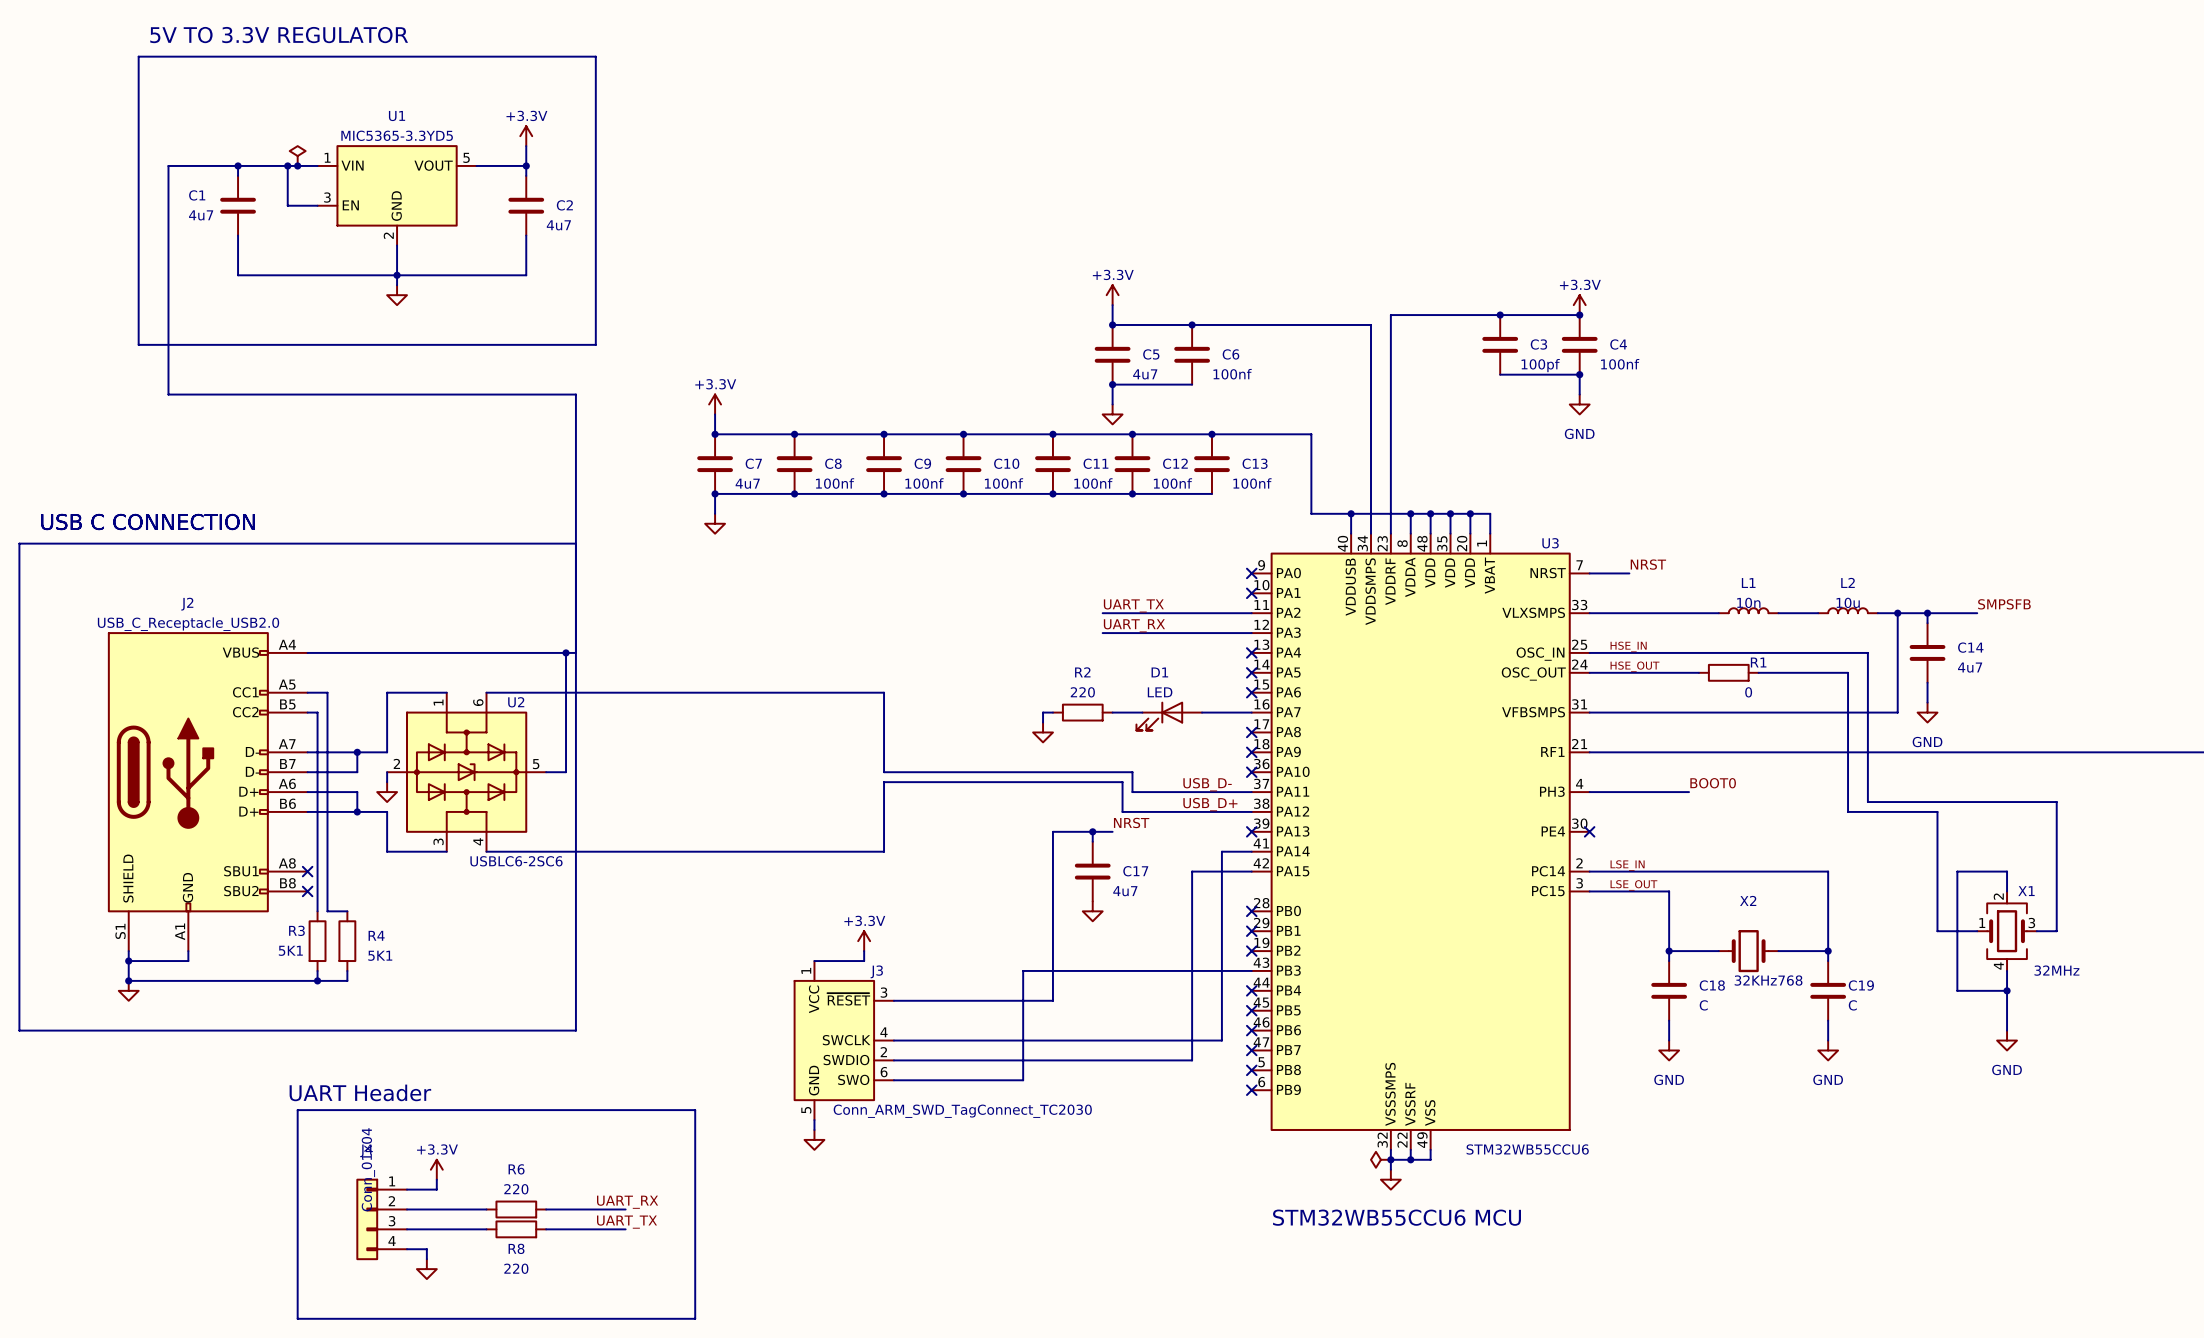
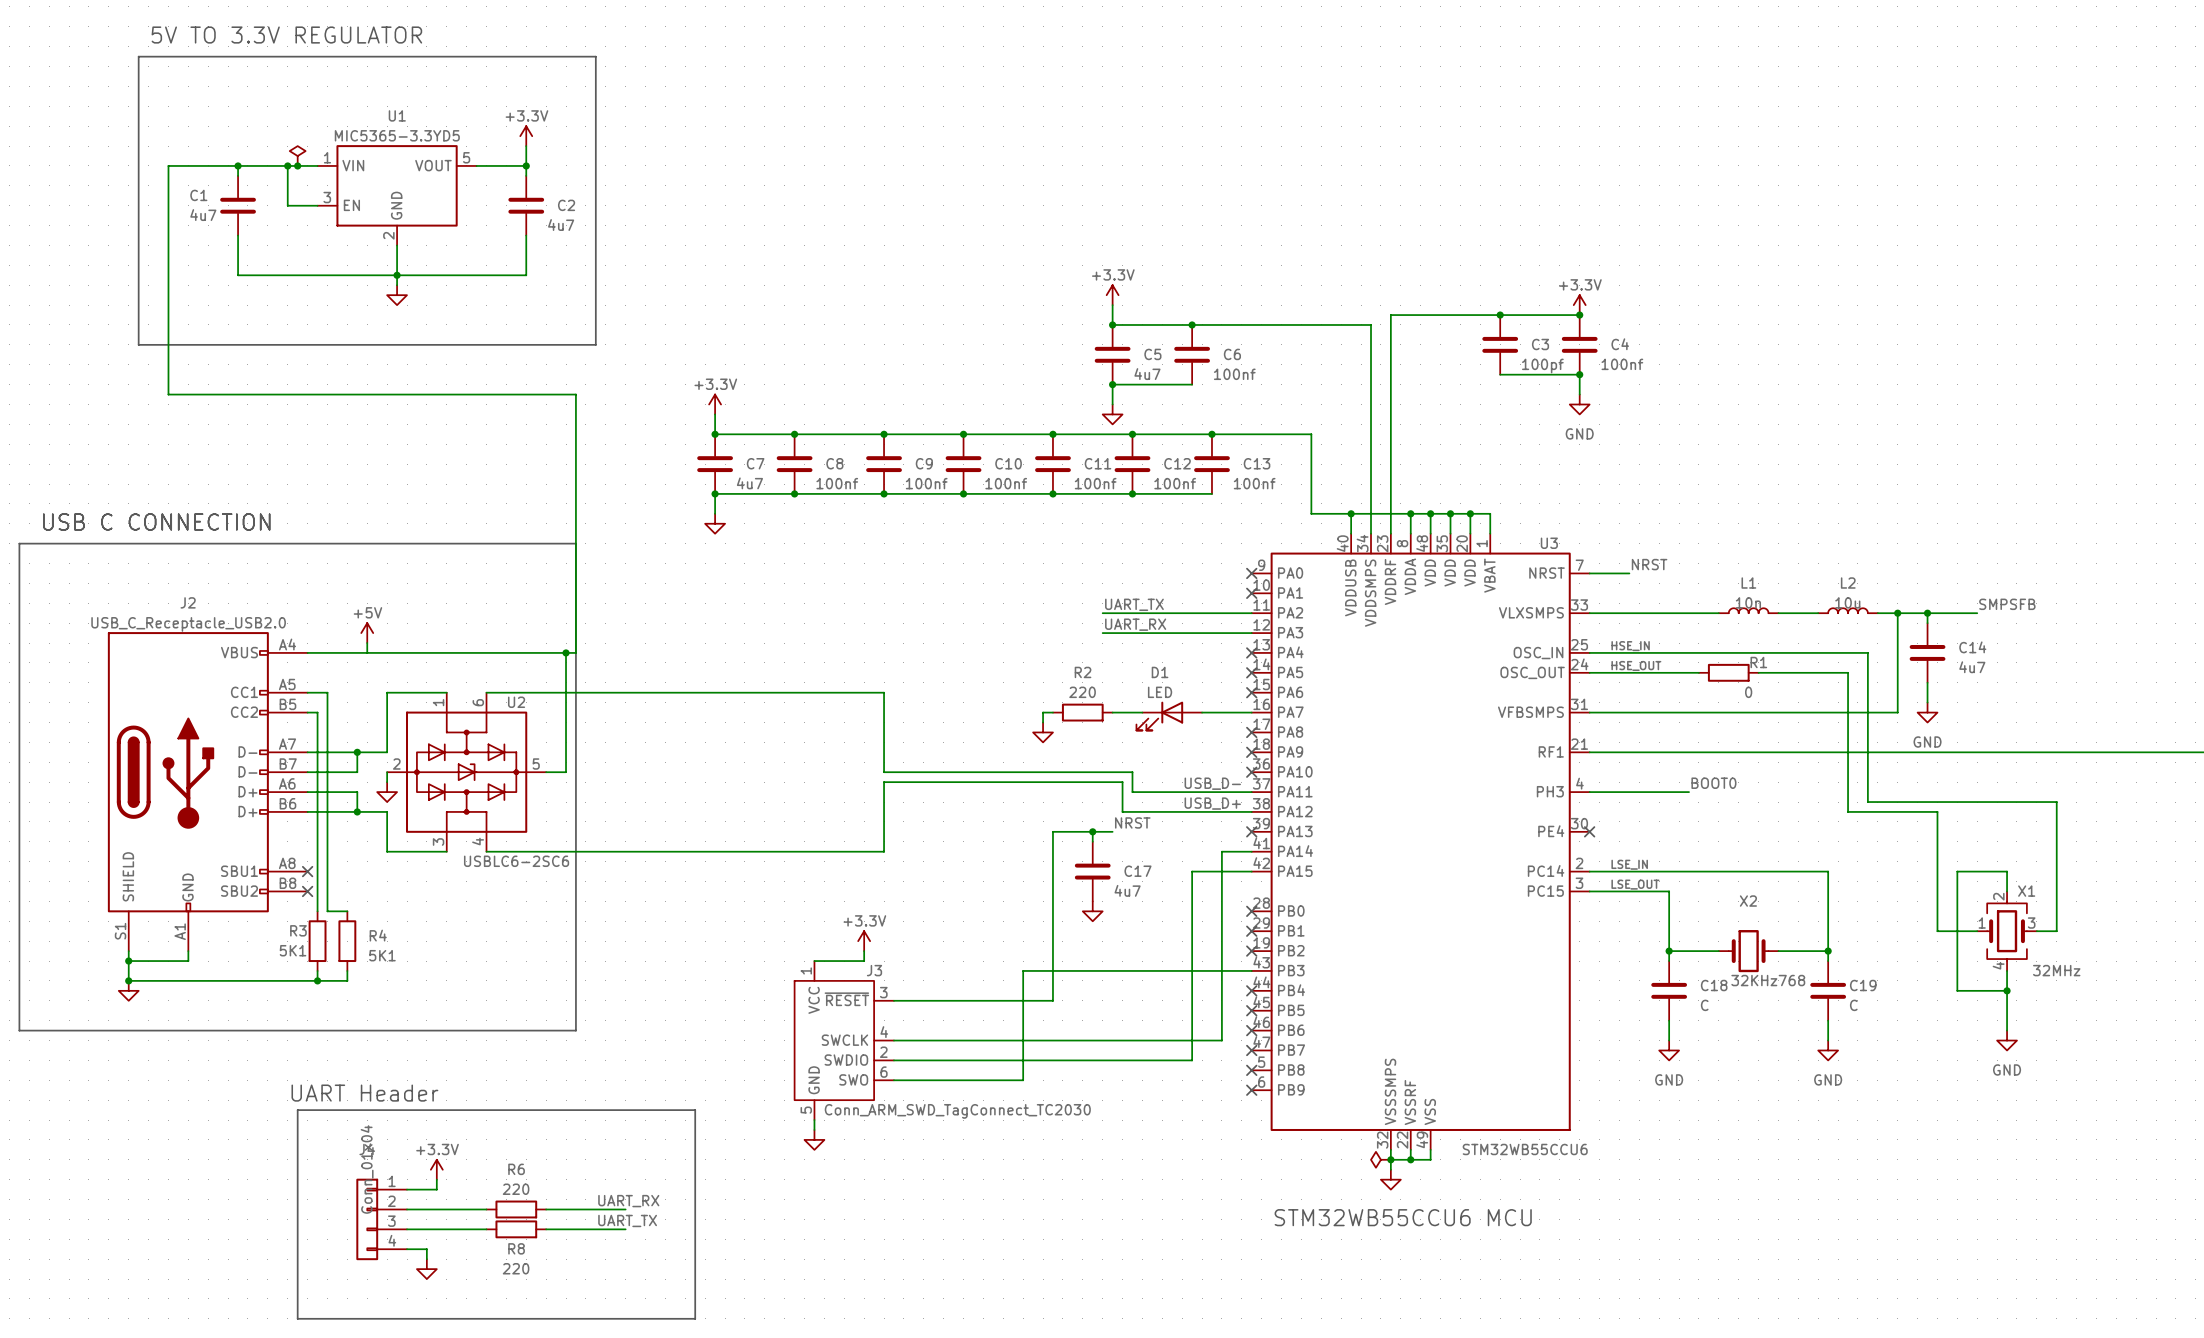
power symbol: none -> +5V (367, 633)
wire: none -> (367, 643) (367, 652)

